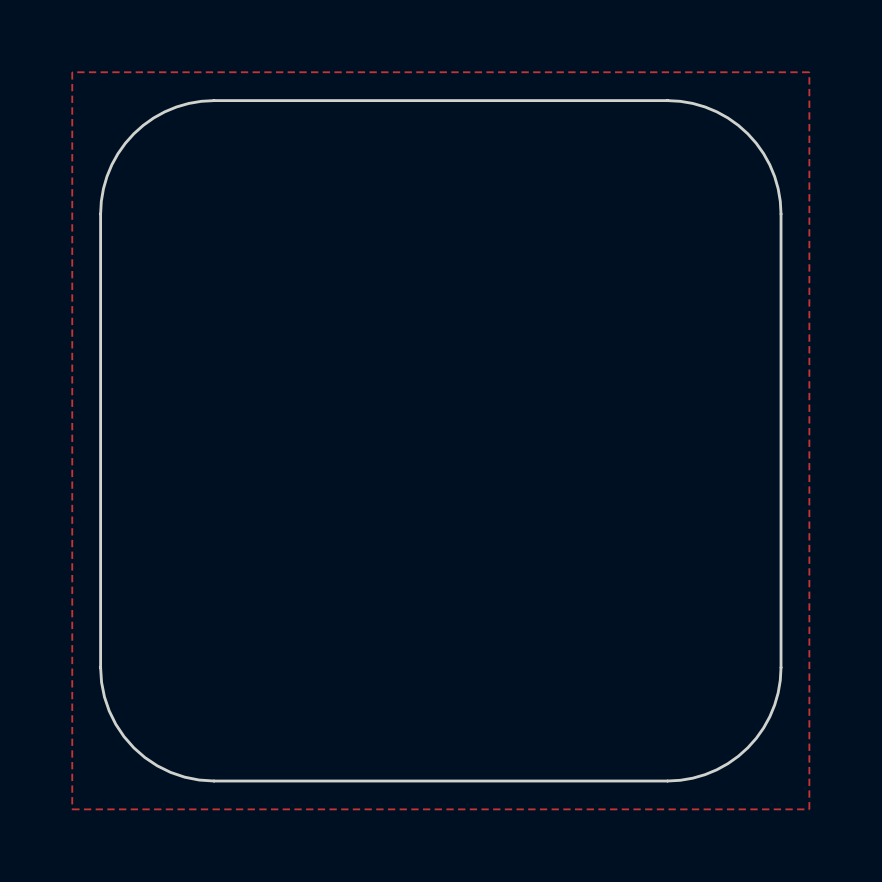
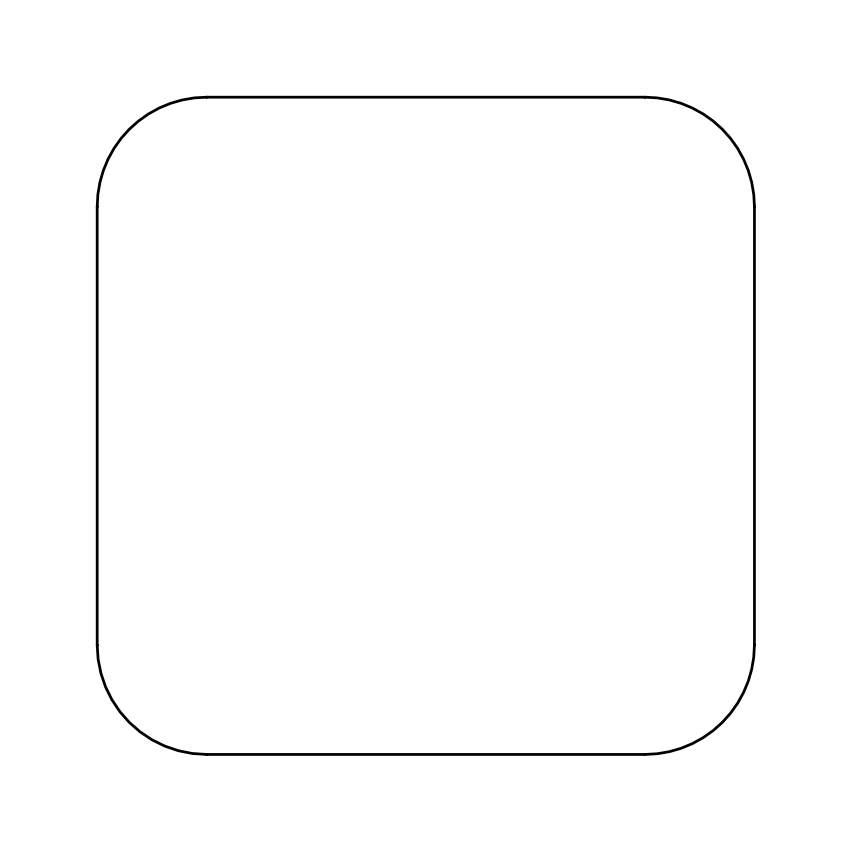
top zone outline: (809, 72) (72, 72) (72, 809) (809, 809) (809, 72) -> none

